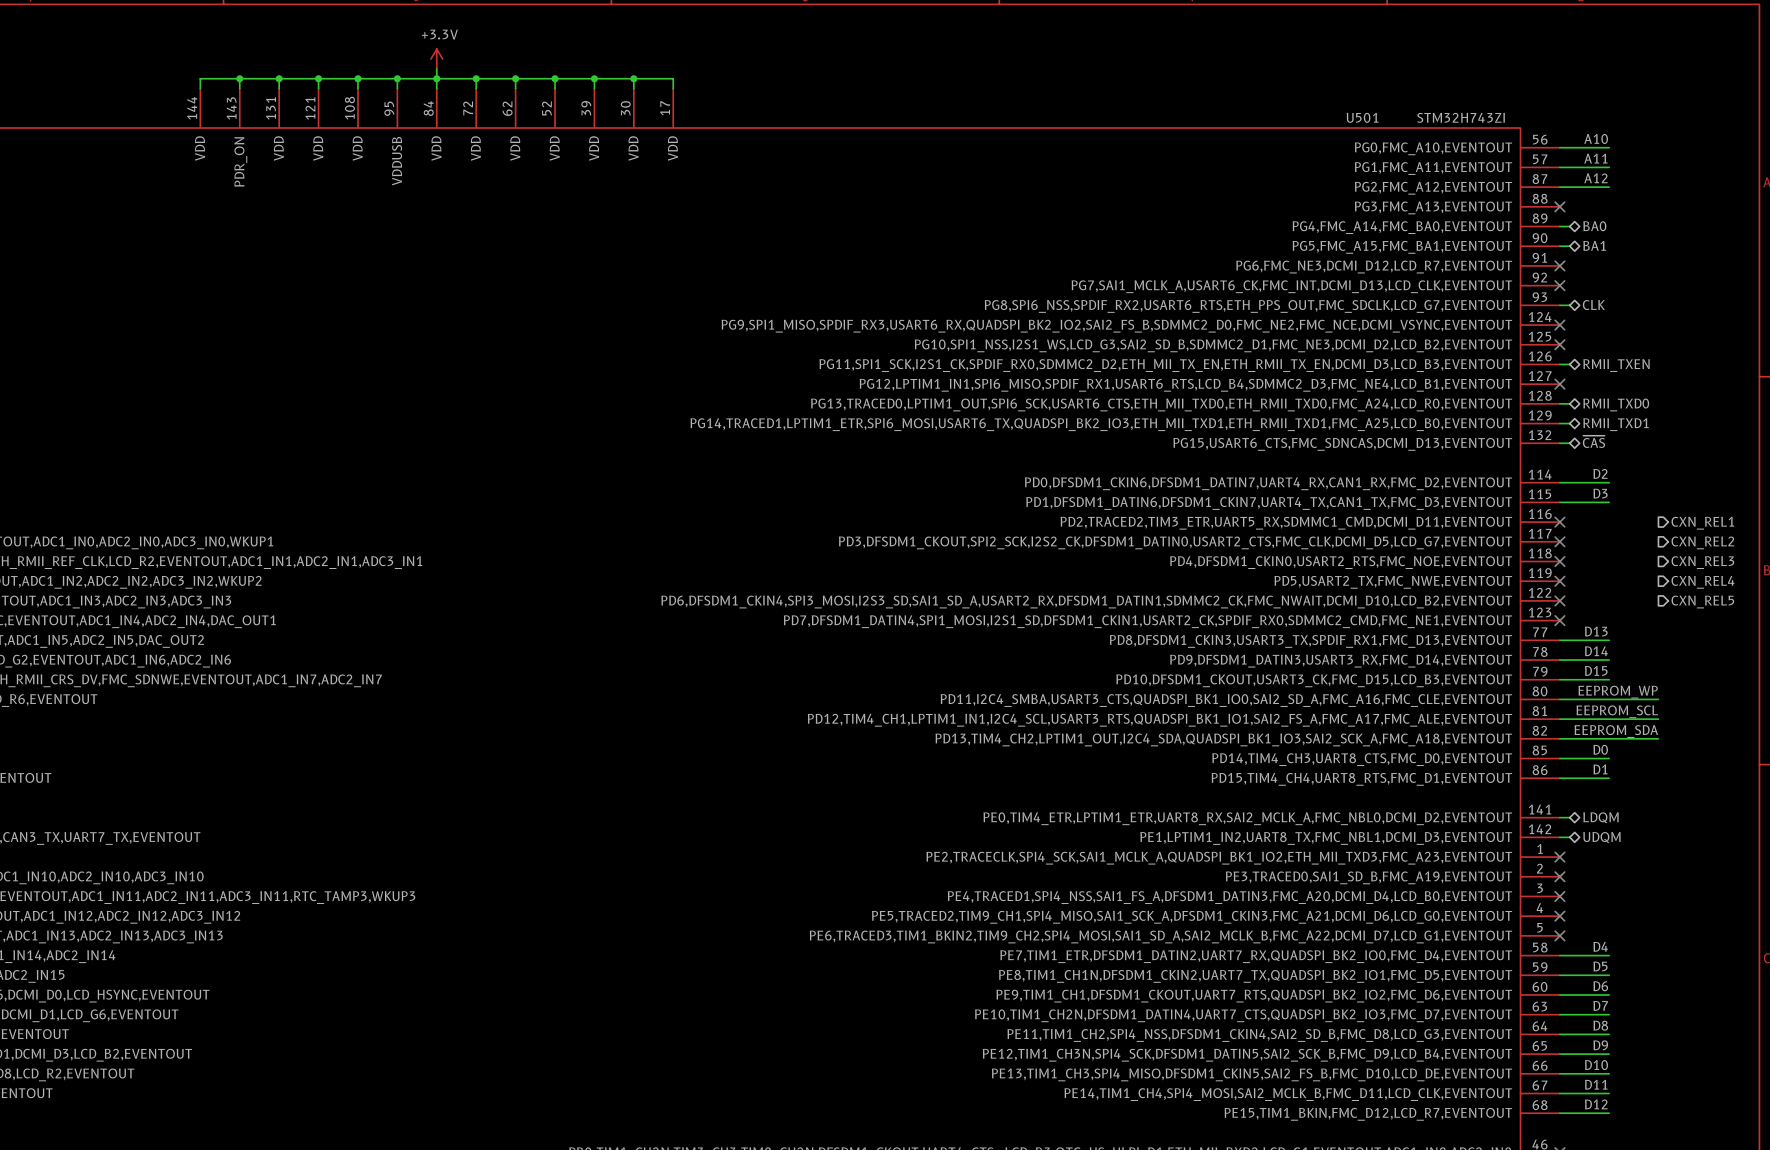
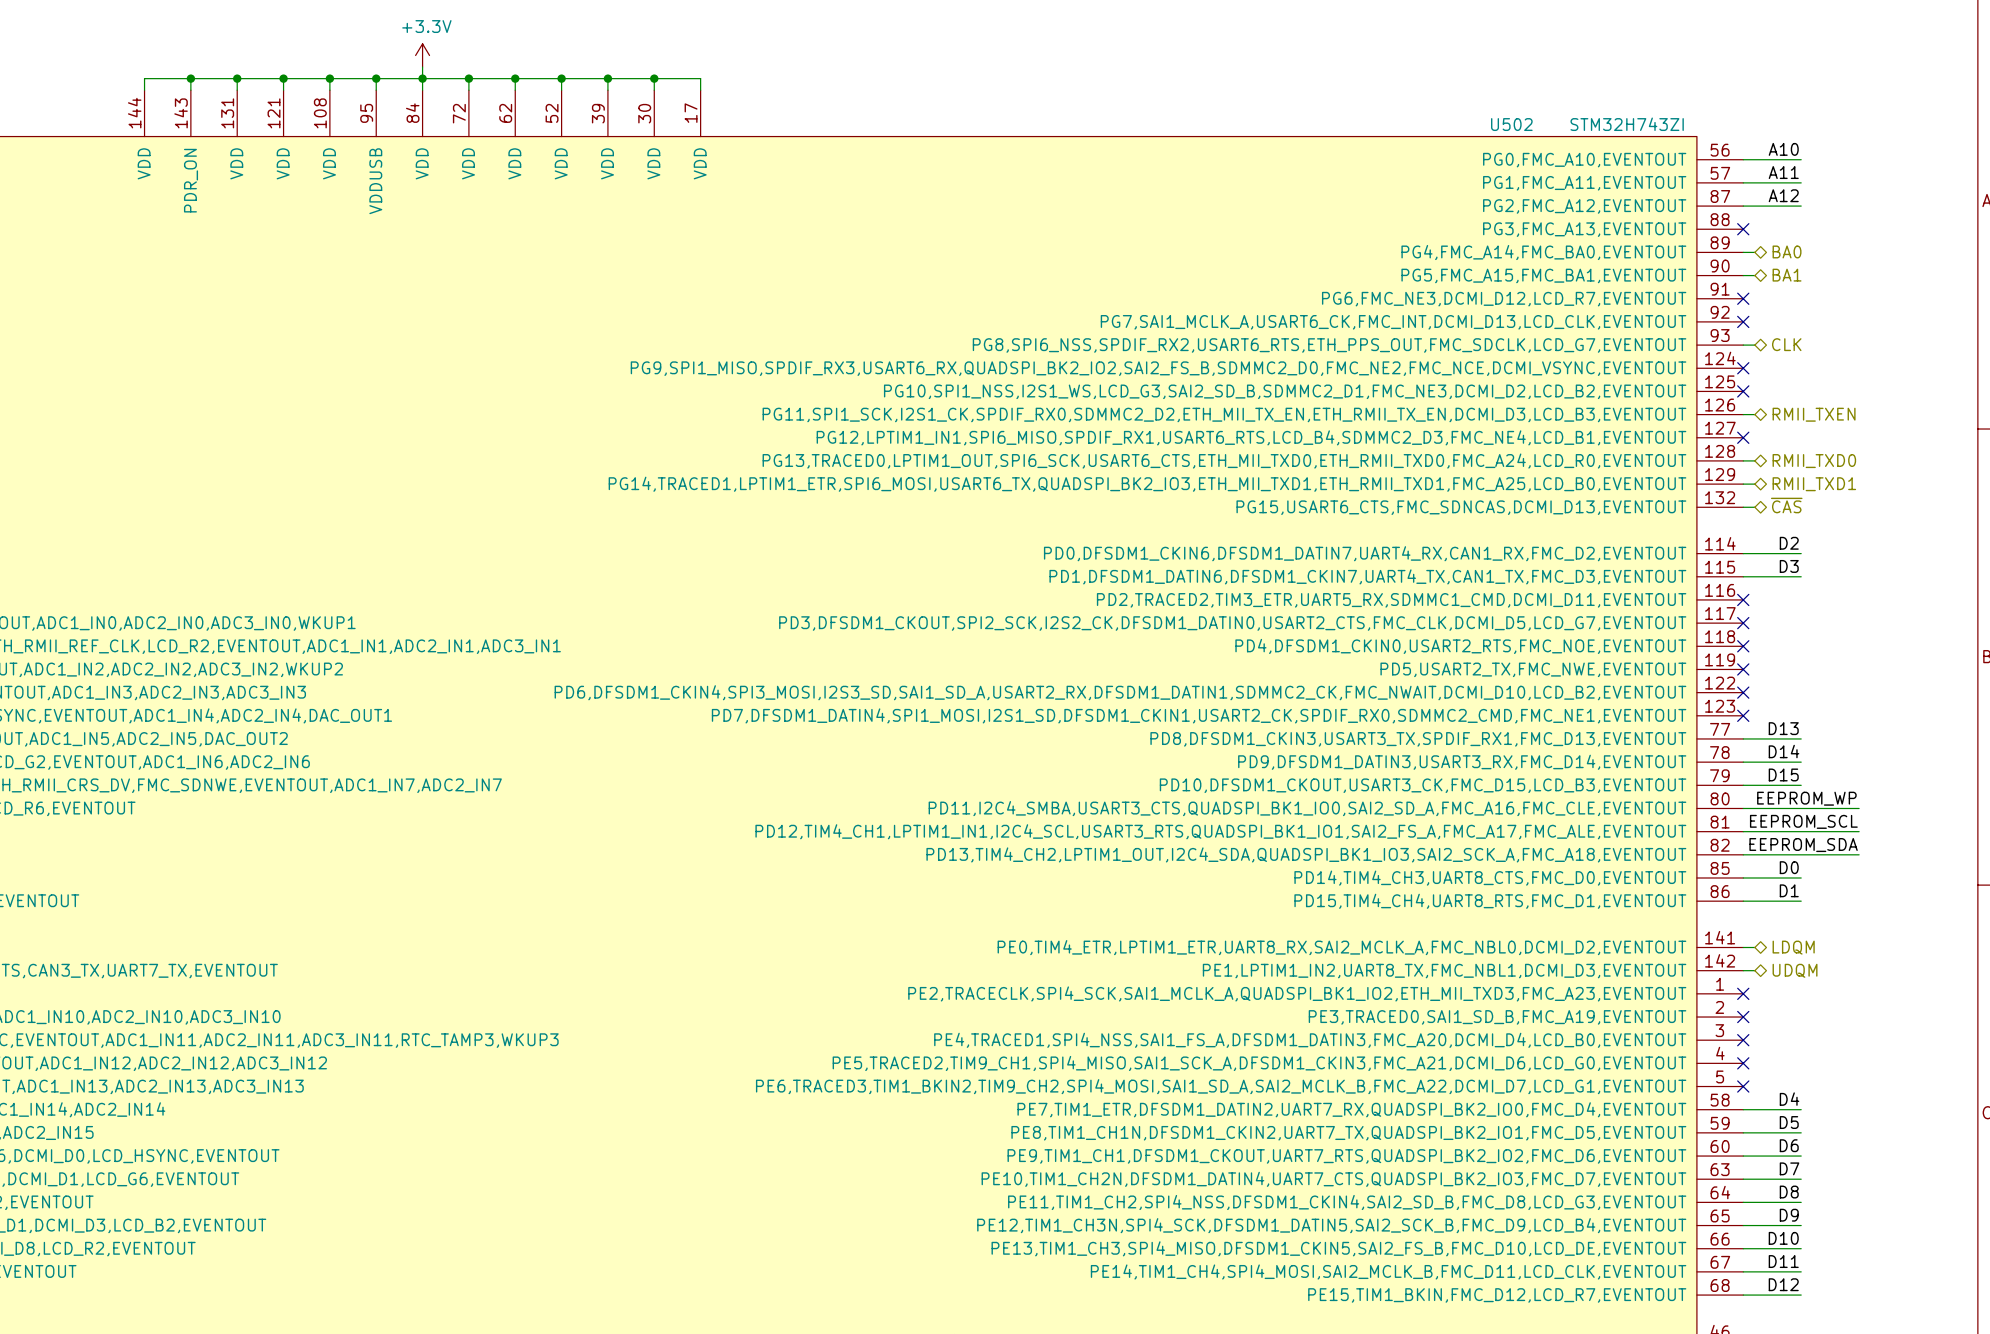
U501 name: U501 (1362, 117) -> U502 (1511, 124)
hierarchical label: CXN_REL1 (1702, 523) -> none
hierarchical label: CXN_REL2 (1702, 542) -> none
hierarchical label: CXN_REL3 (1702, 562) -> none
hierarchical label: CXN_REL4 (1703, 582) -> none
hierarchical label: CXN_REL5 (1702, 602) -> none

